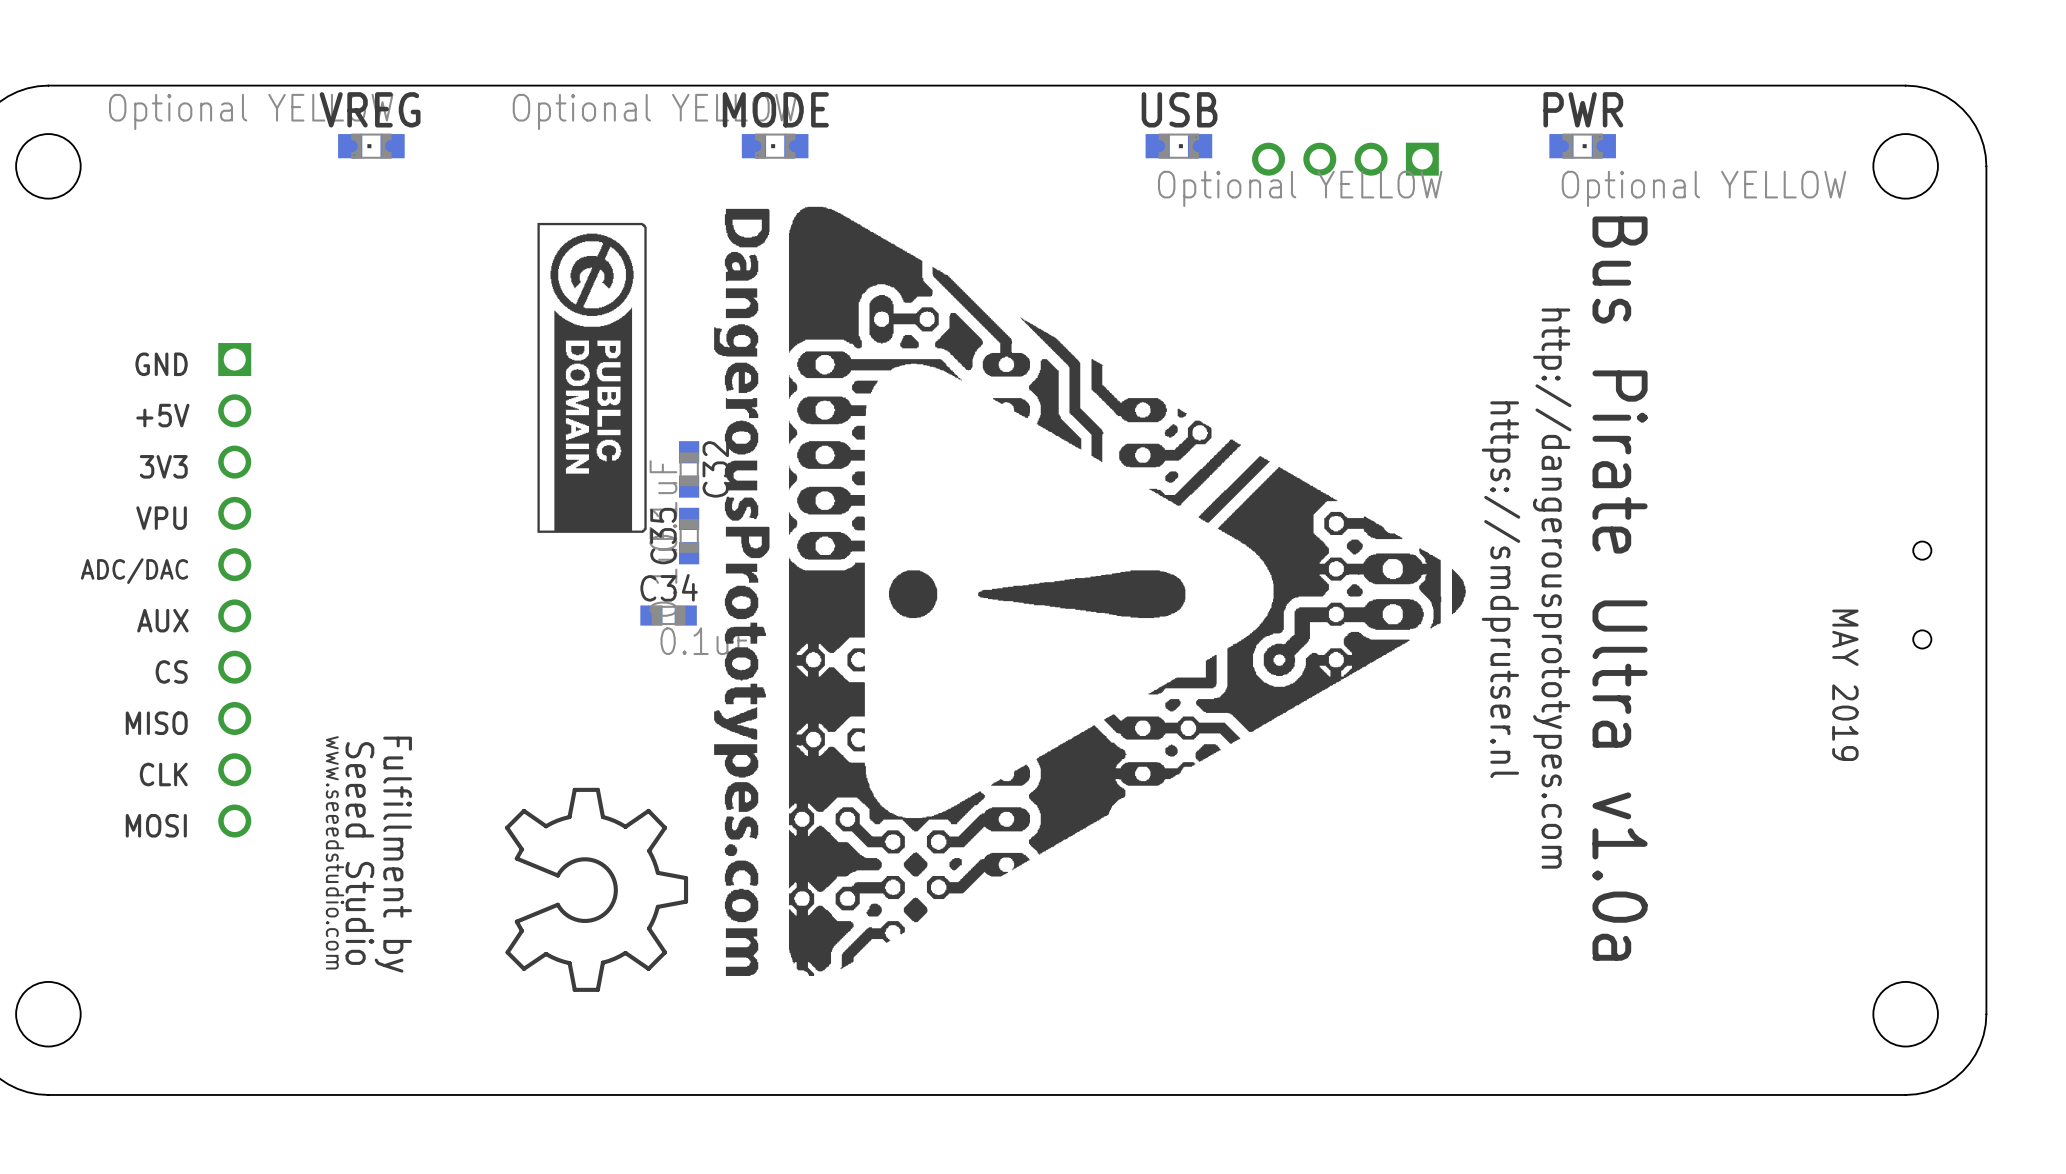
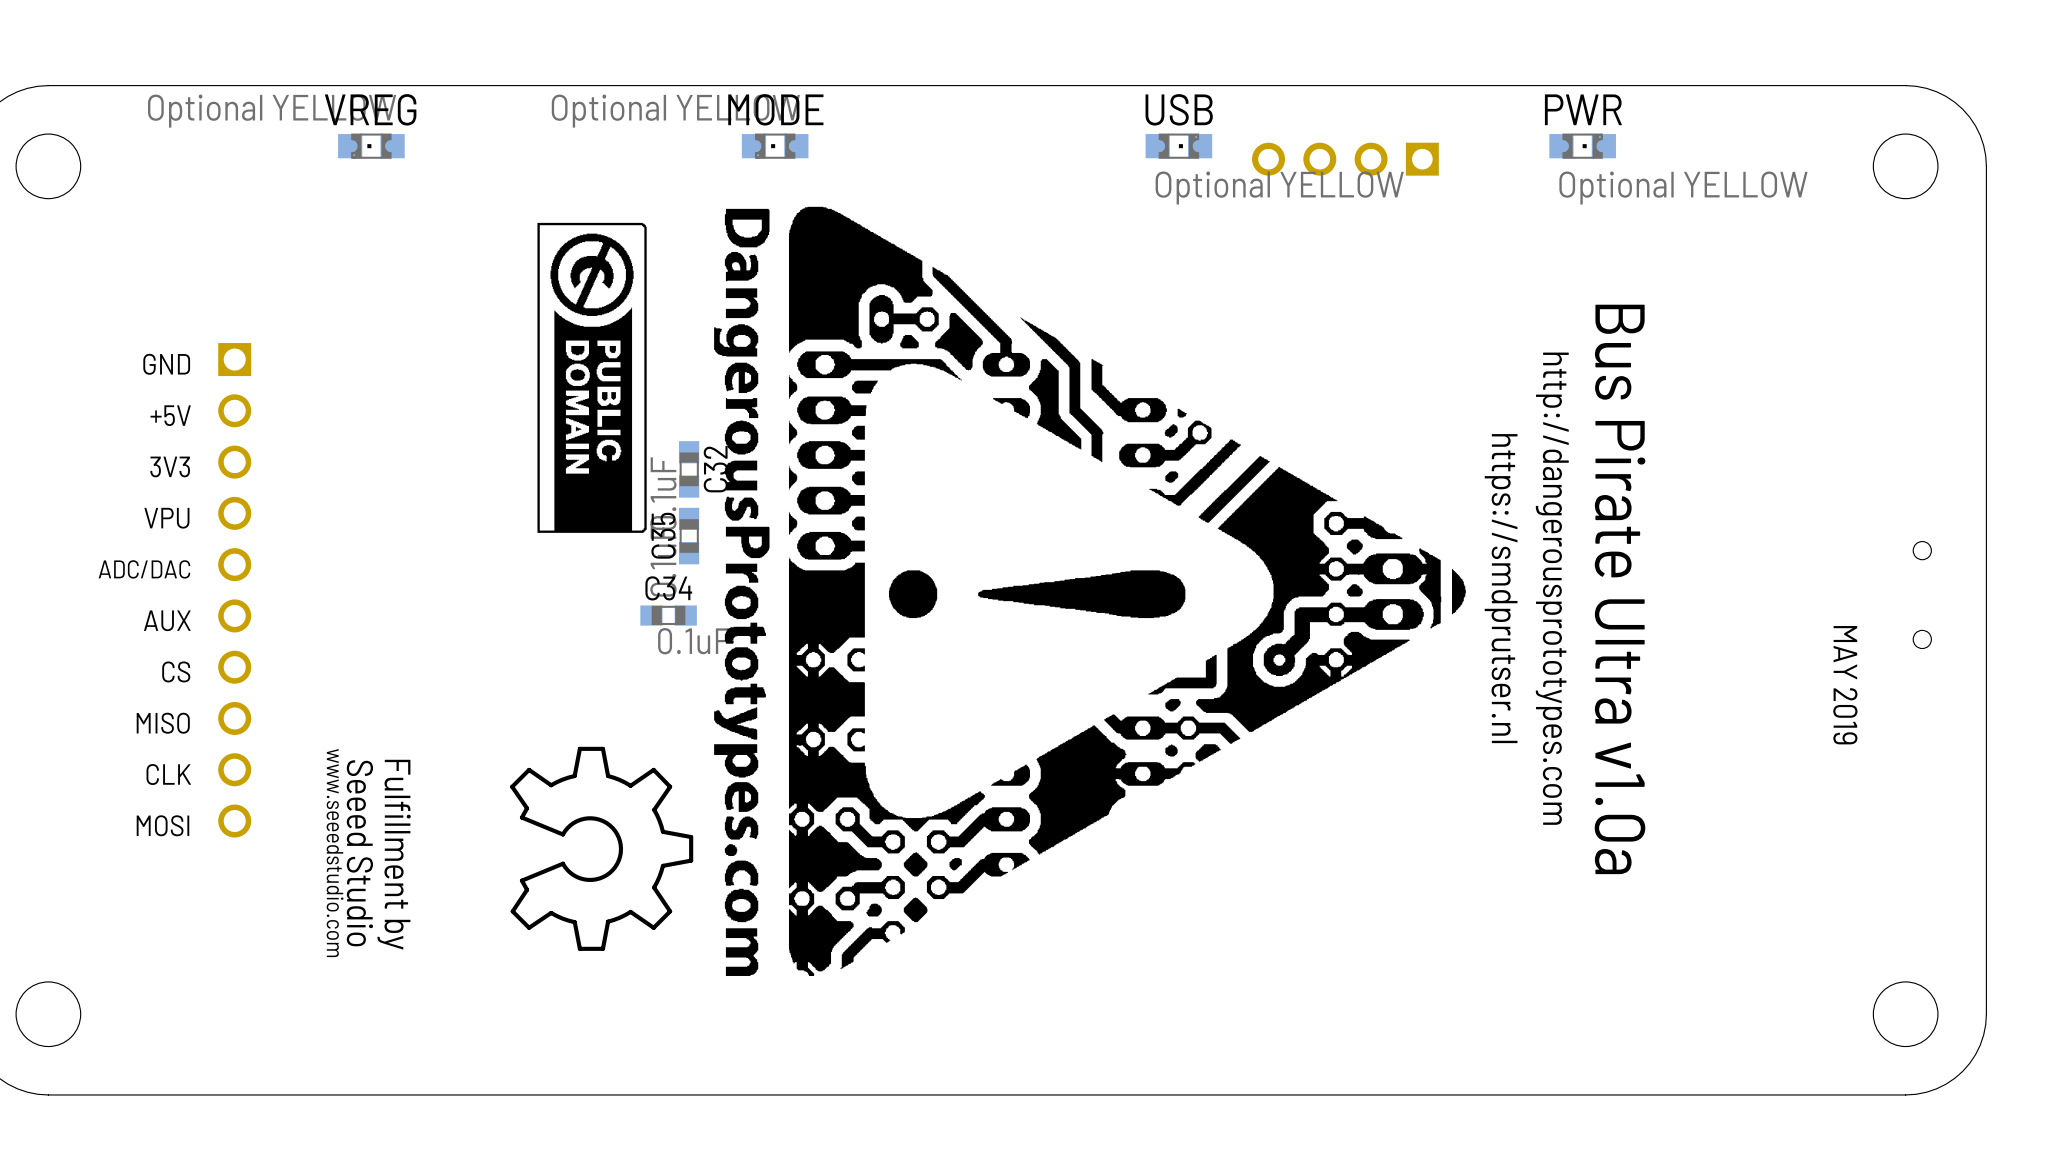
drawing position: (596, 889) -> (601, 848)

